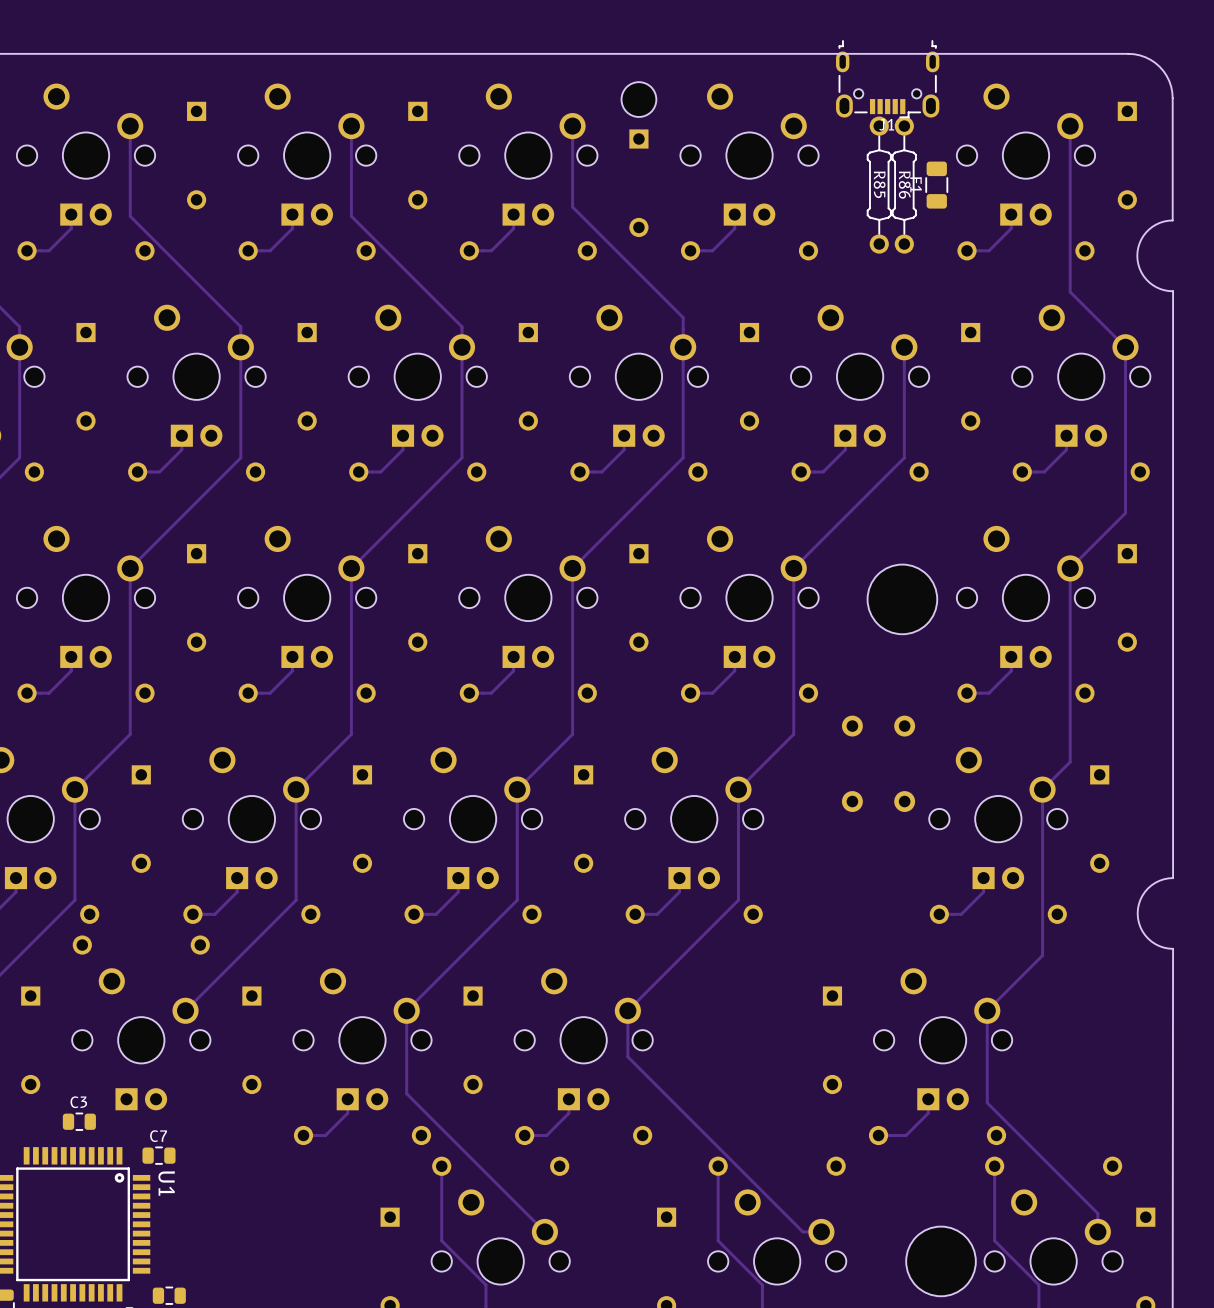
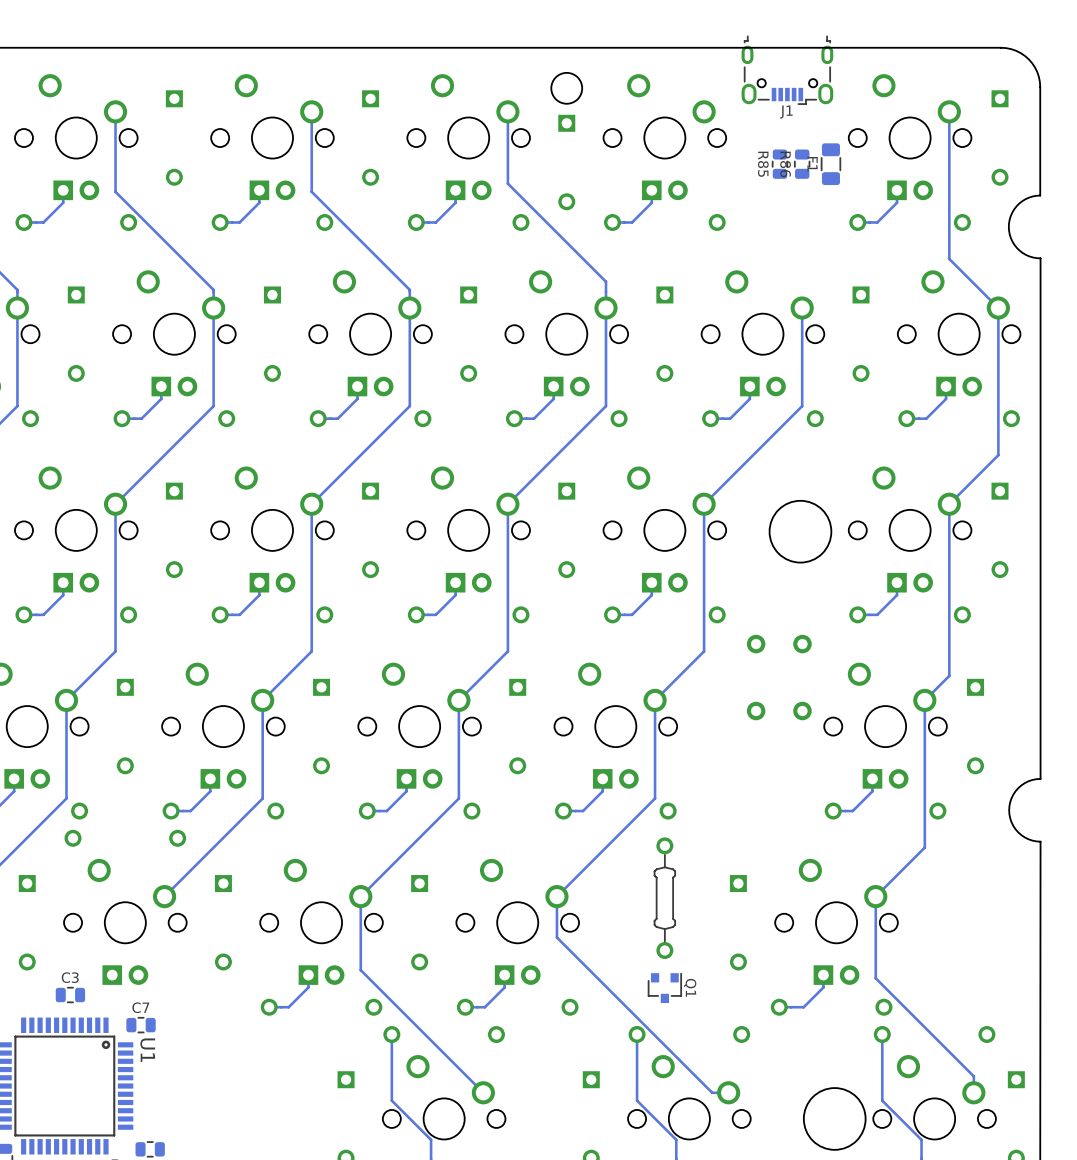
R85 footprint: [866, 116, 892, 254] -> [772, 149, 788, 179]
R86 footprint: [891, 116, 917, 254] -> [794, 149, 811, 179]
part: none -> (664, 898)
Q1: none -> (664, 988)

